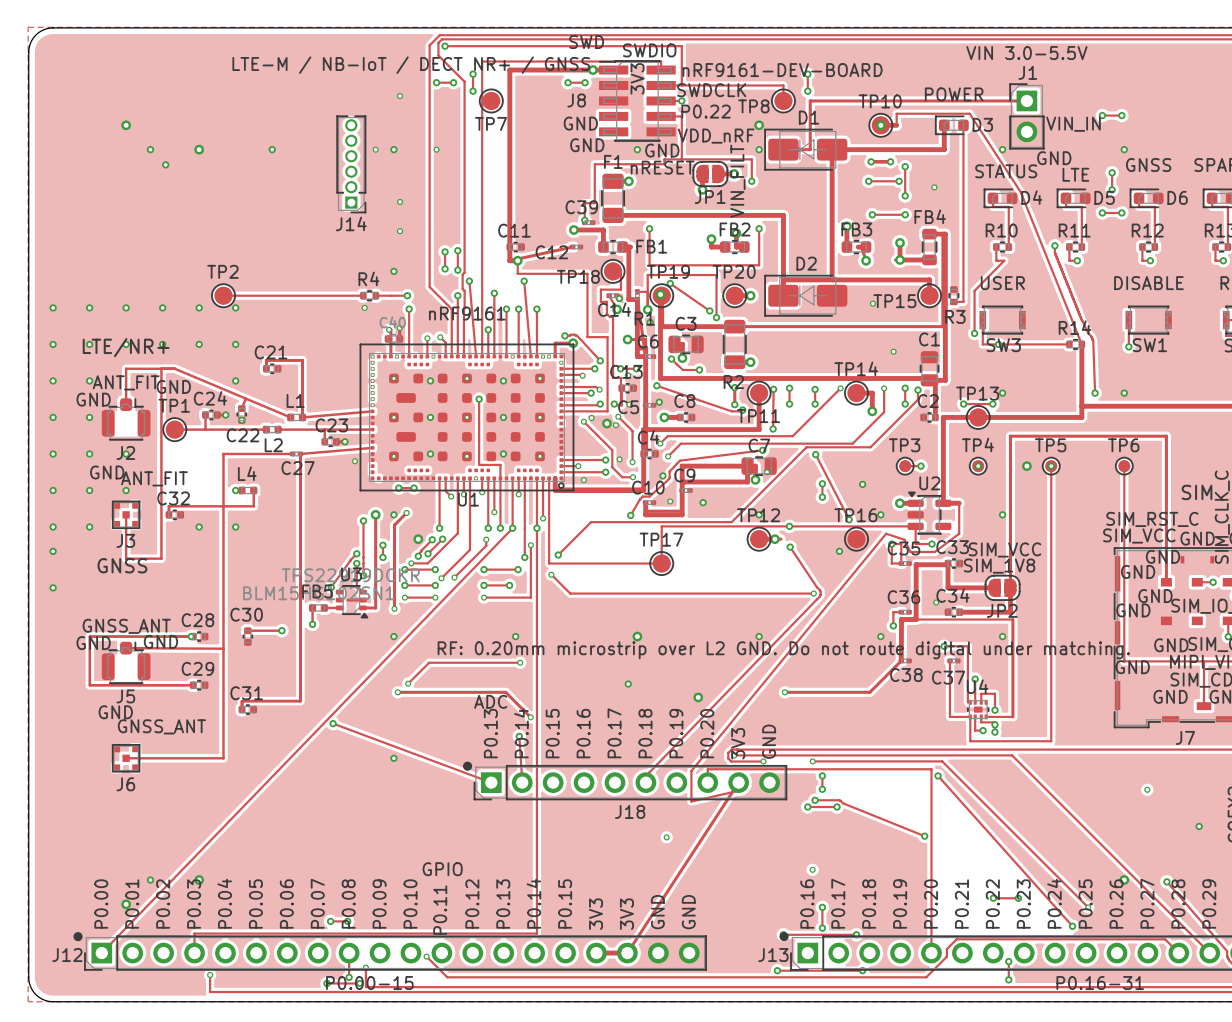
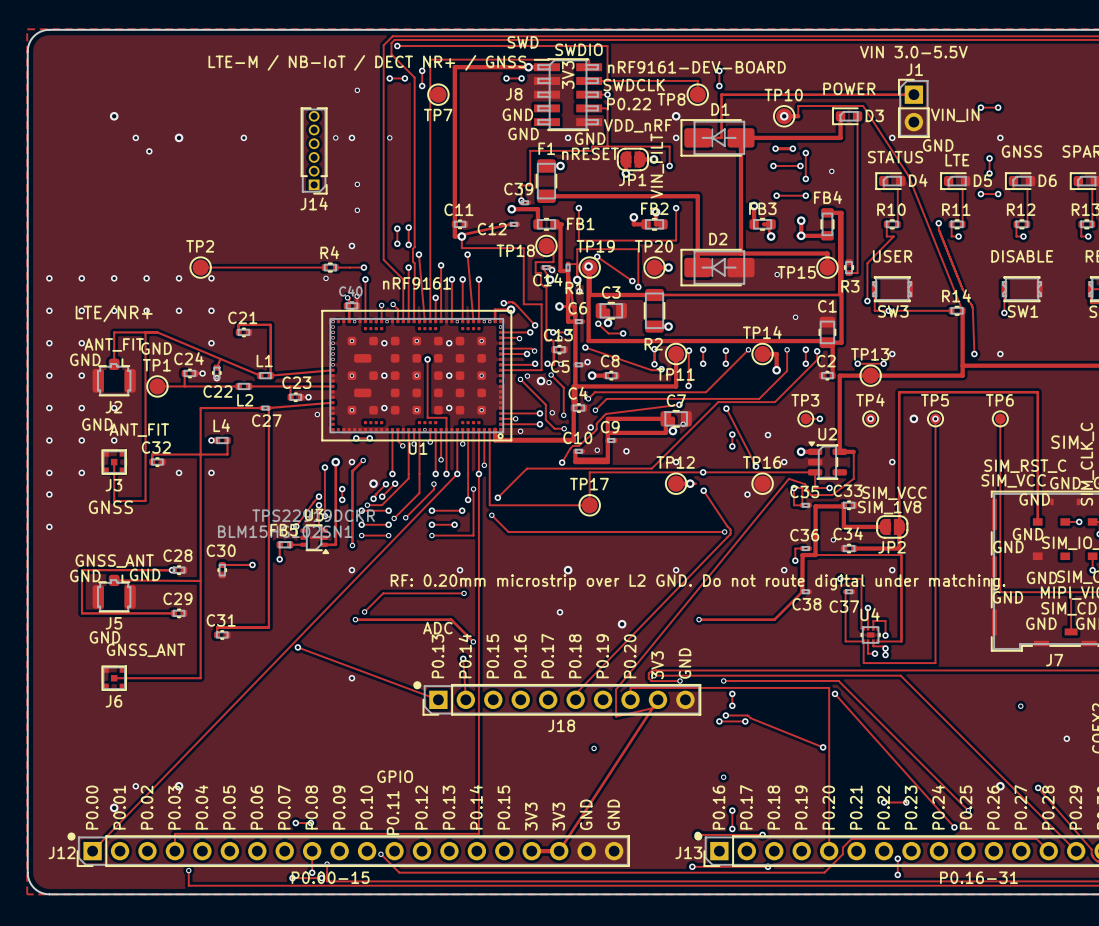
text: GND (1138, 571) -> none

